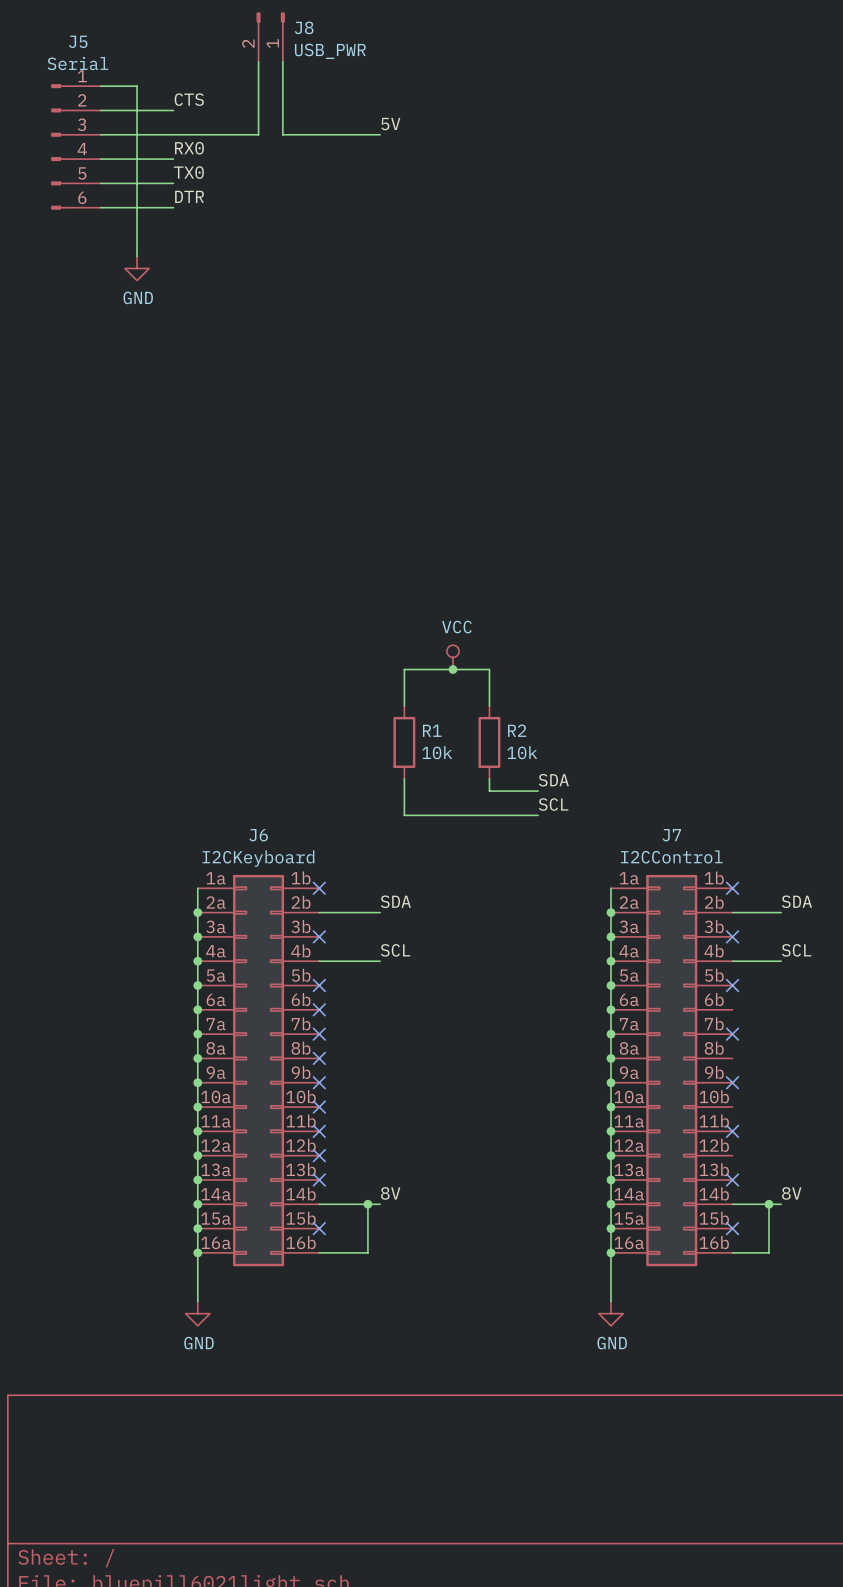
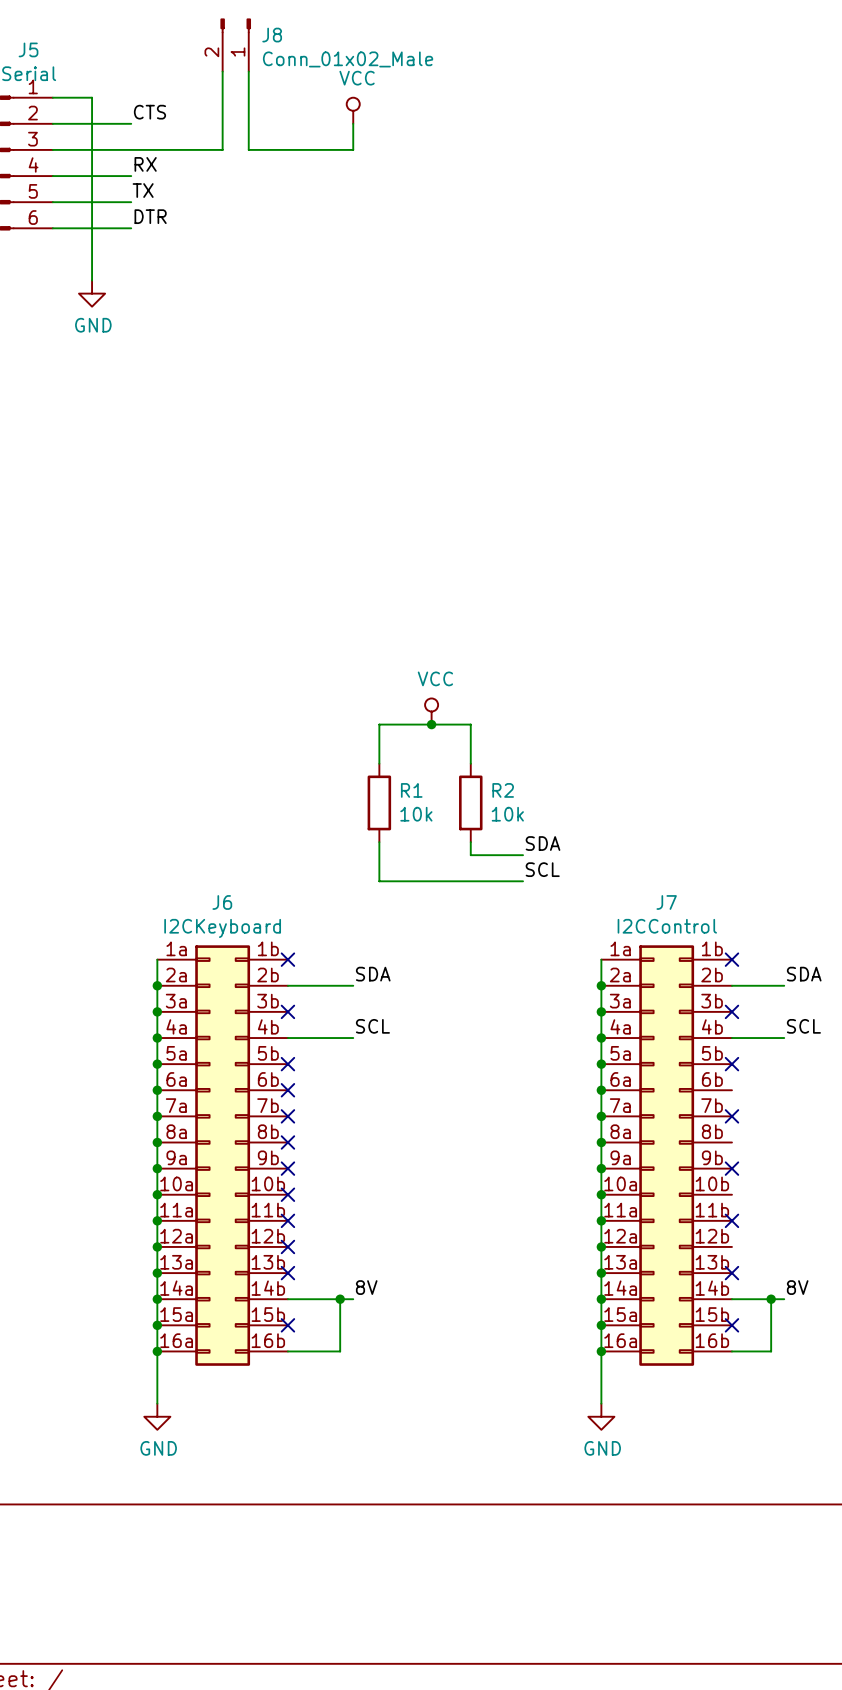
J8 value: USB_PWR (330, 51) -> Conn_01x02_Male (348, 59)
power symbol: none -> VCC (353, 110)
wire: none -> (353, 123) (353, 149)
label: 5V (390, 124) -> none
label: RX0 (189, 148) -> RX (145, 164)
label: TX0 (188, 172) -> TX (143, 190)

